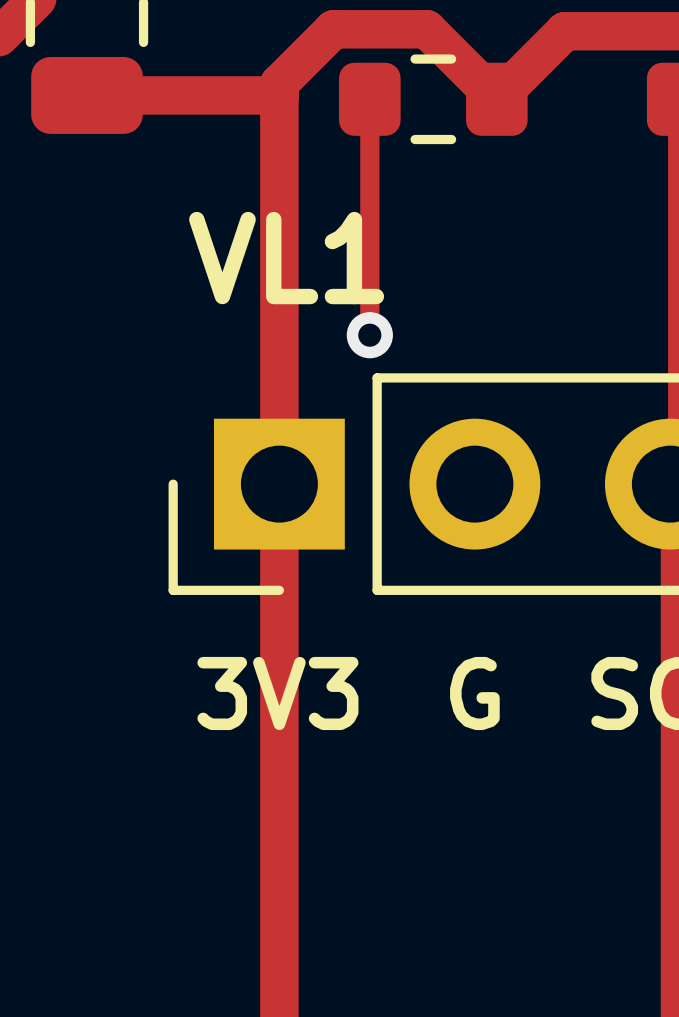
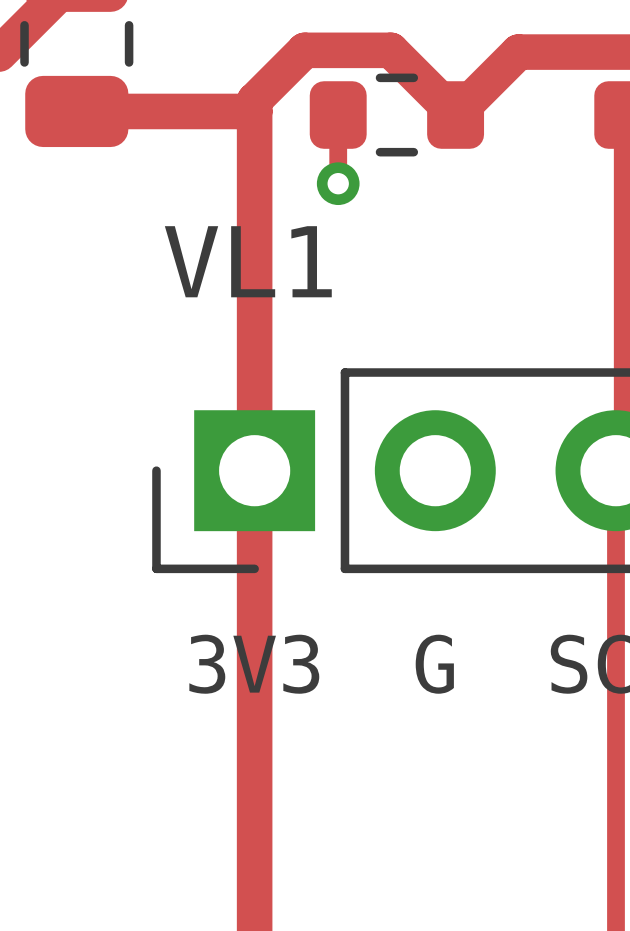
track: (369, 173) (369, 335) -> none
via position: (369, 335) -> (338, 183)

